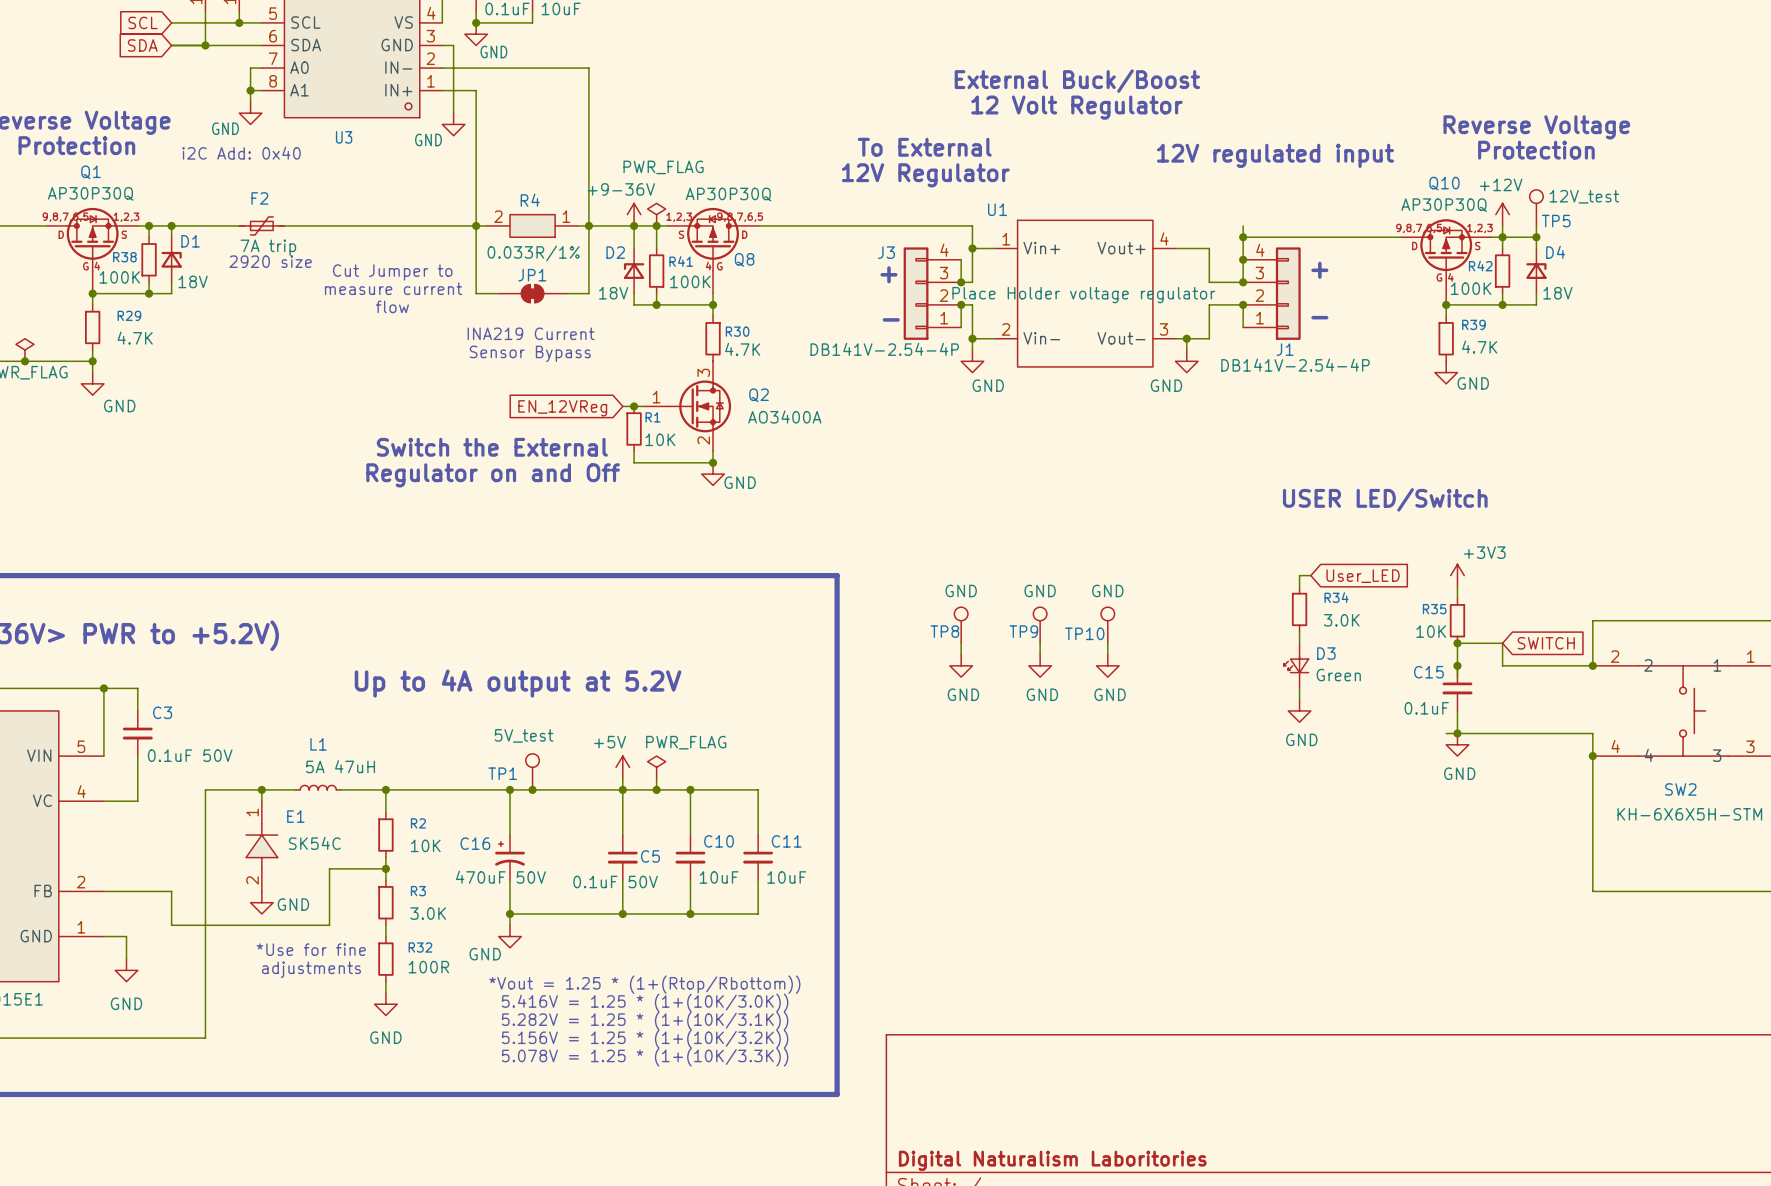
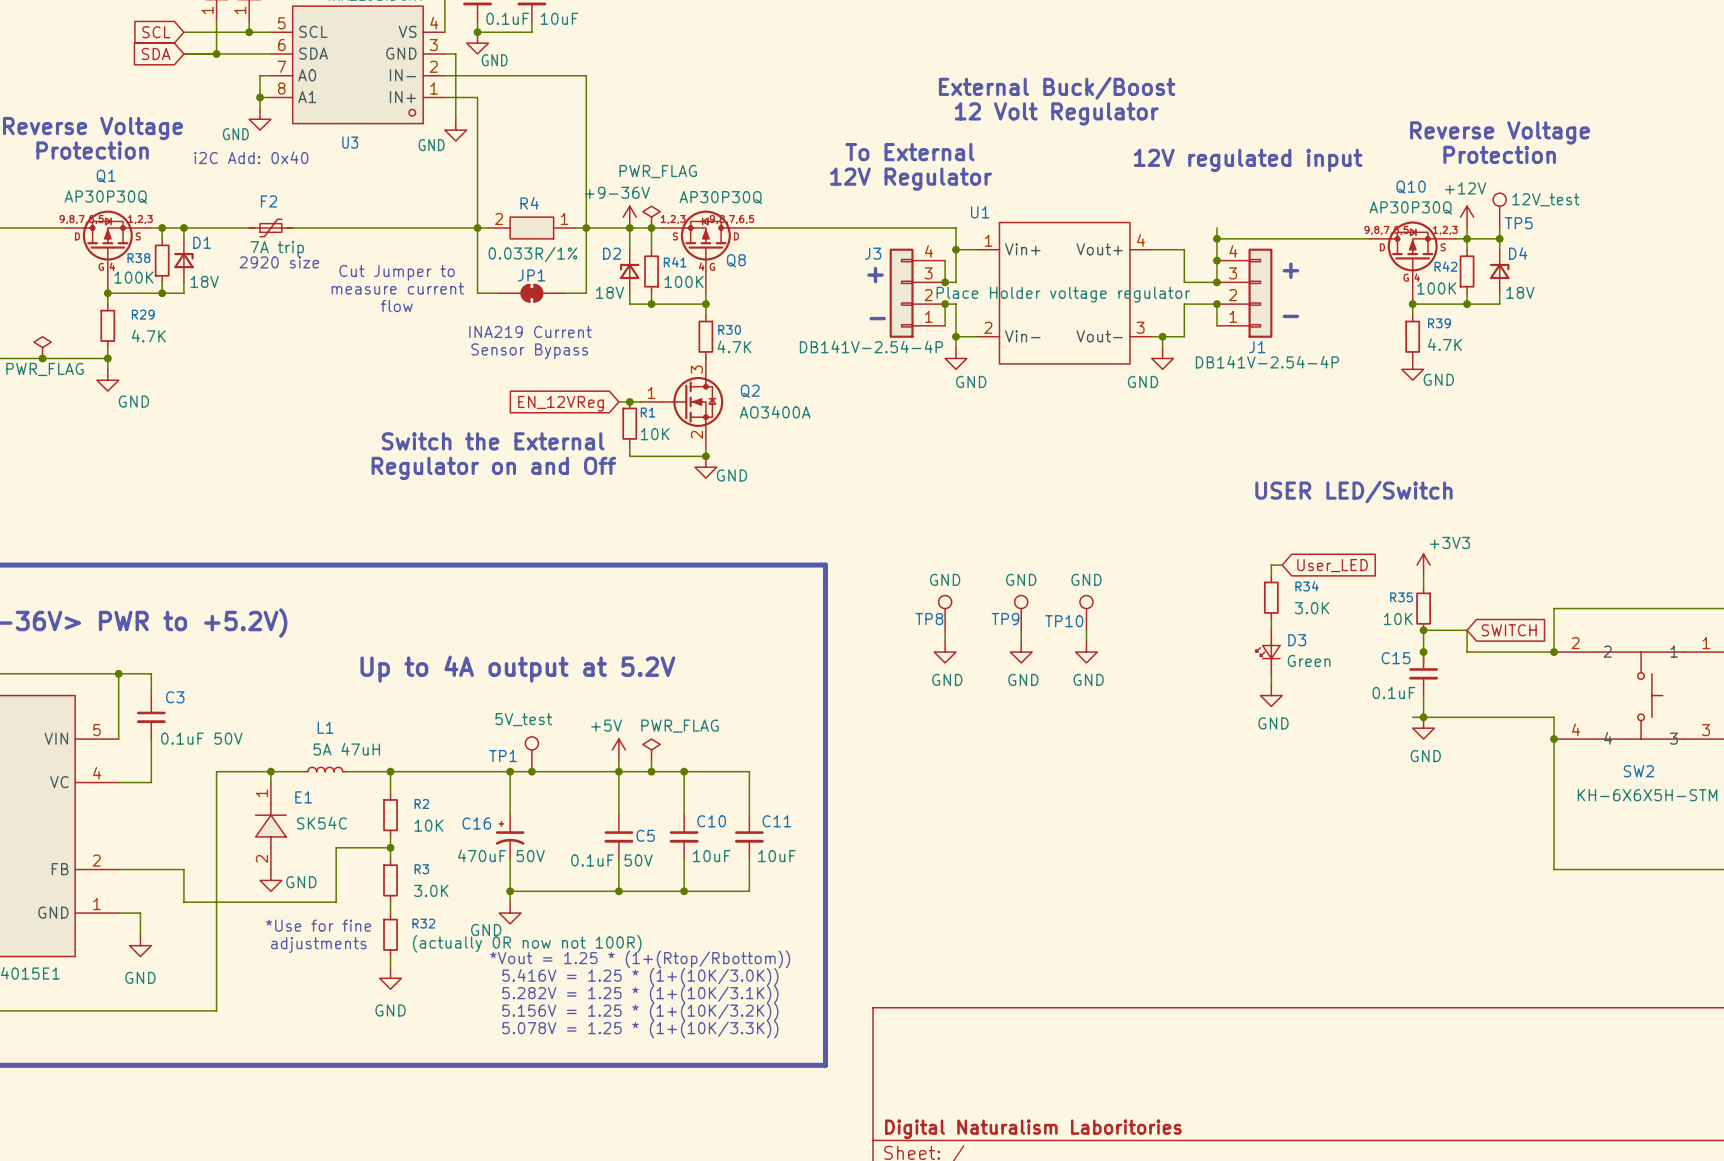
R32 value: 100R (428, 967) -> (actually 0R now not 100R) (527, 943)

